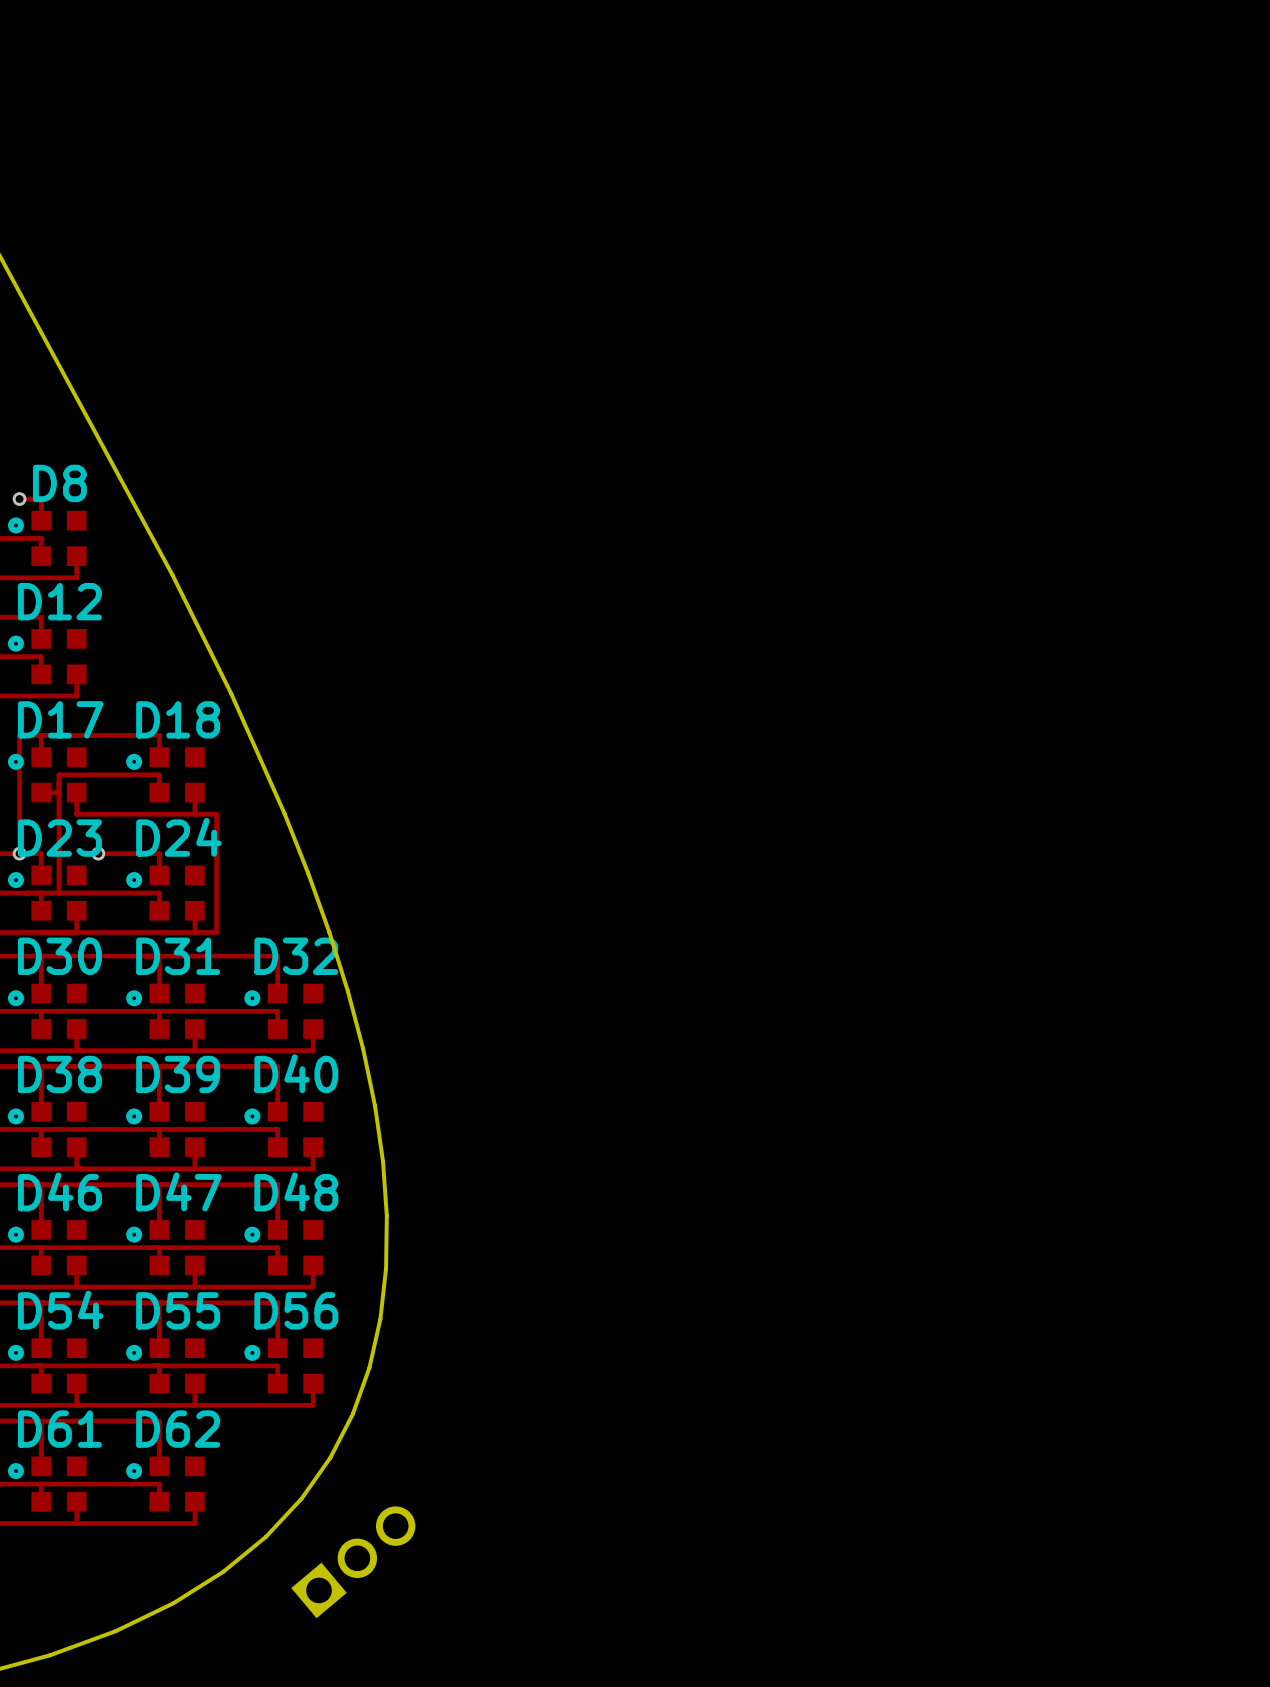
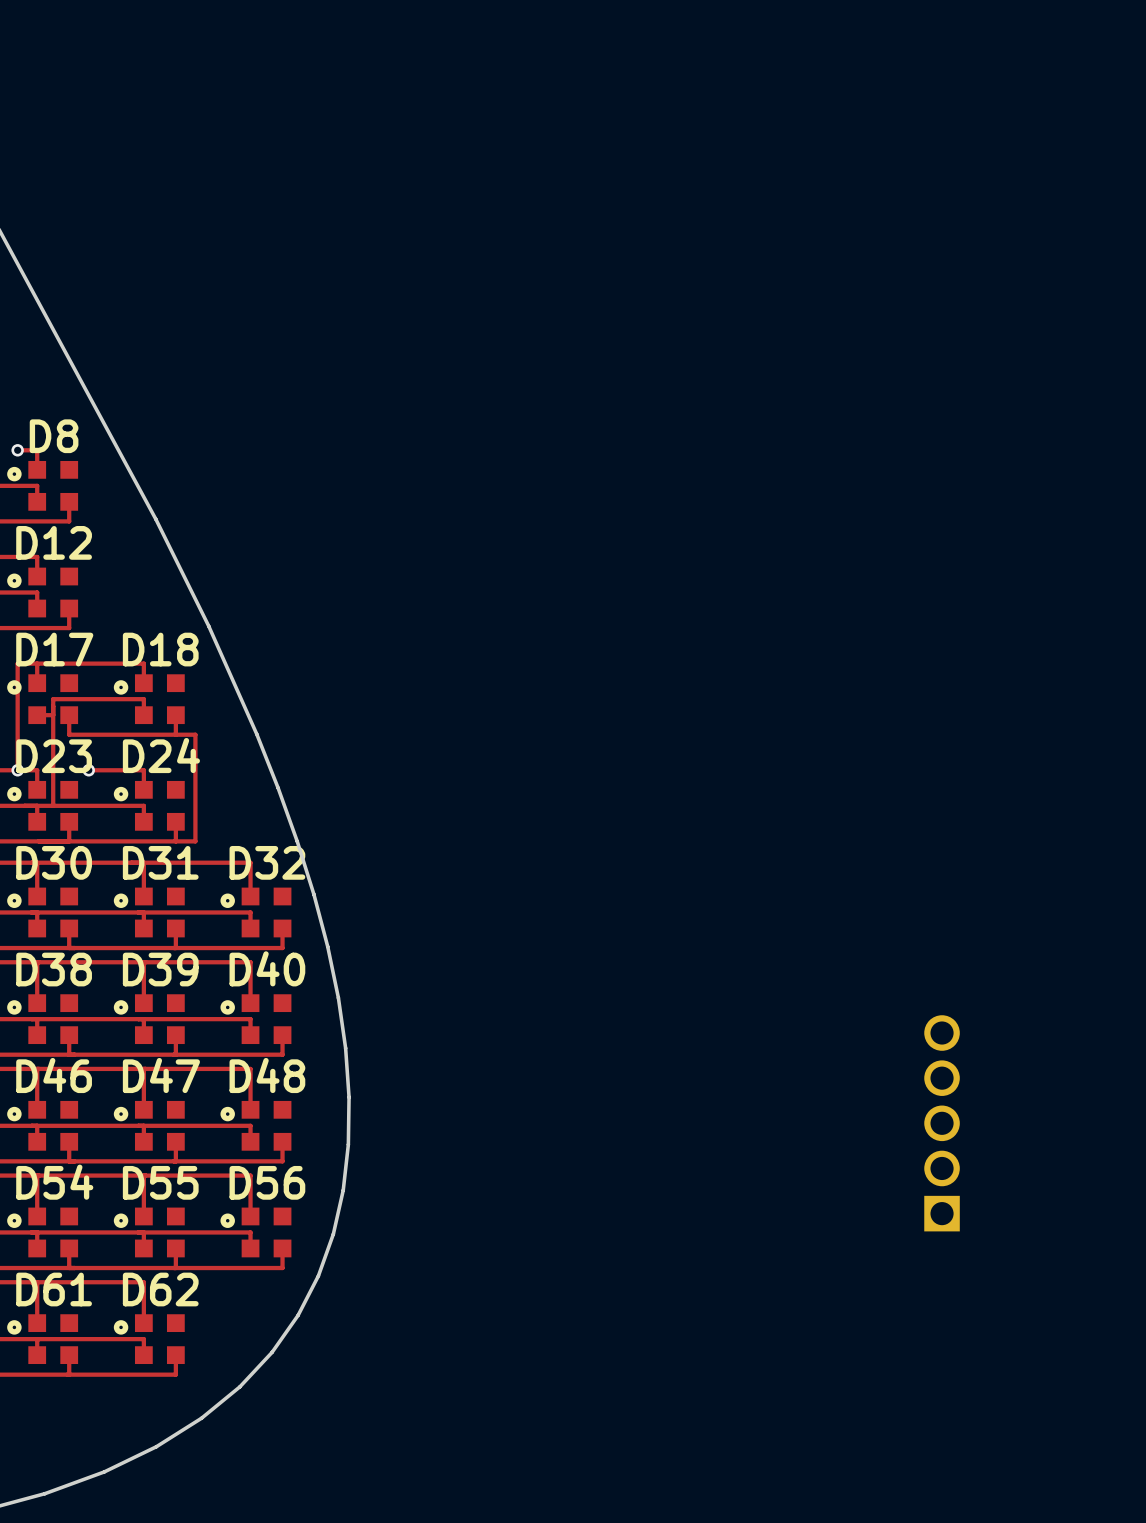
part: none -> (942, 1123)
part: (353, 1562) -> none

